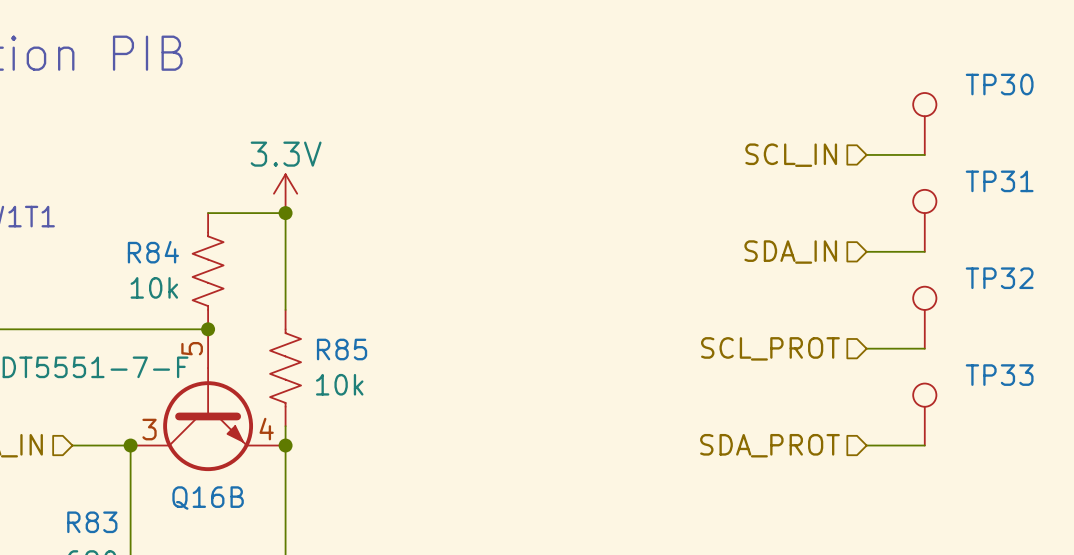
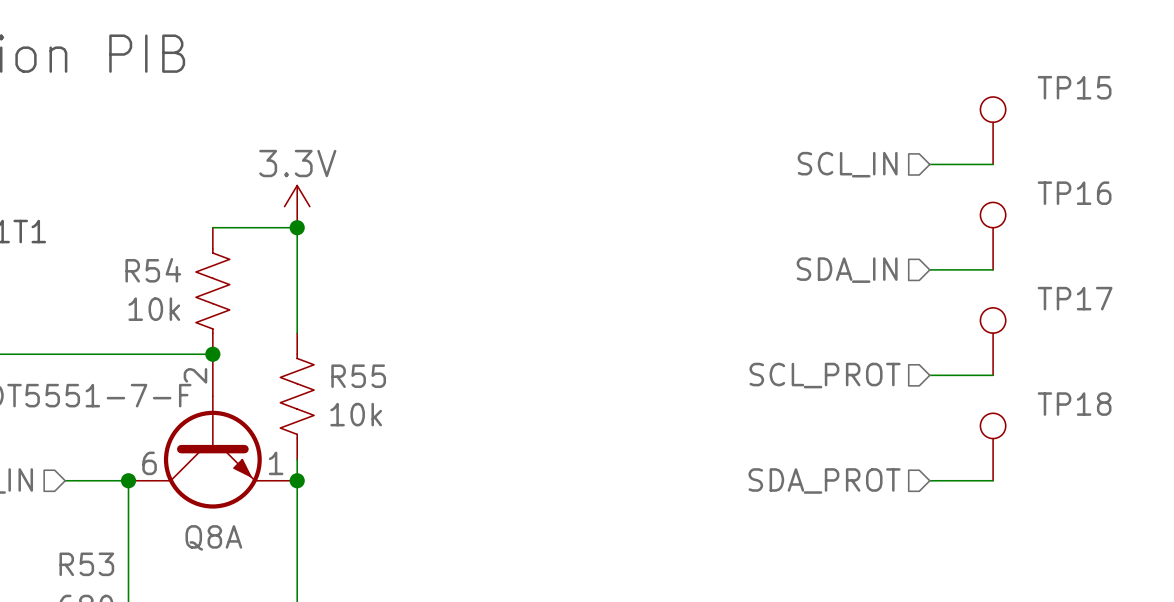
TP30 name: TP30 (999, 84) -> TP15 (1074, 87)
TP31 name: TP31 (999, 181) -> TP16 (1074, 193)
R84 name: R84 (153, 252) -> R54 (153, 270)
TP32 name: TP32 (999, 278) -> TP17 (1075, 298)
Q16B pin number: 5 (192, 348) -> 2 (195, 375)
R85 name: R85 (342, 349) -> R55 (358, 376)
TP33 name: TP33 (999, 375) -> TP18 (1074, 404)
Q16B pin number: 3 (149, 429) -> 6 (149, 463)
Q16B pin number: 4 (266, 429) -> 1 (276, 463)
Q16B name: Q16B (208, 498) -> Q8A (213, 537)
R83 name: R83 (92, 522) -> R53 (86, 564)

